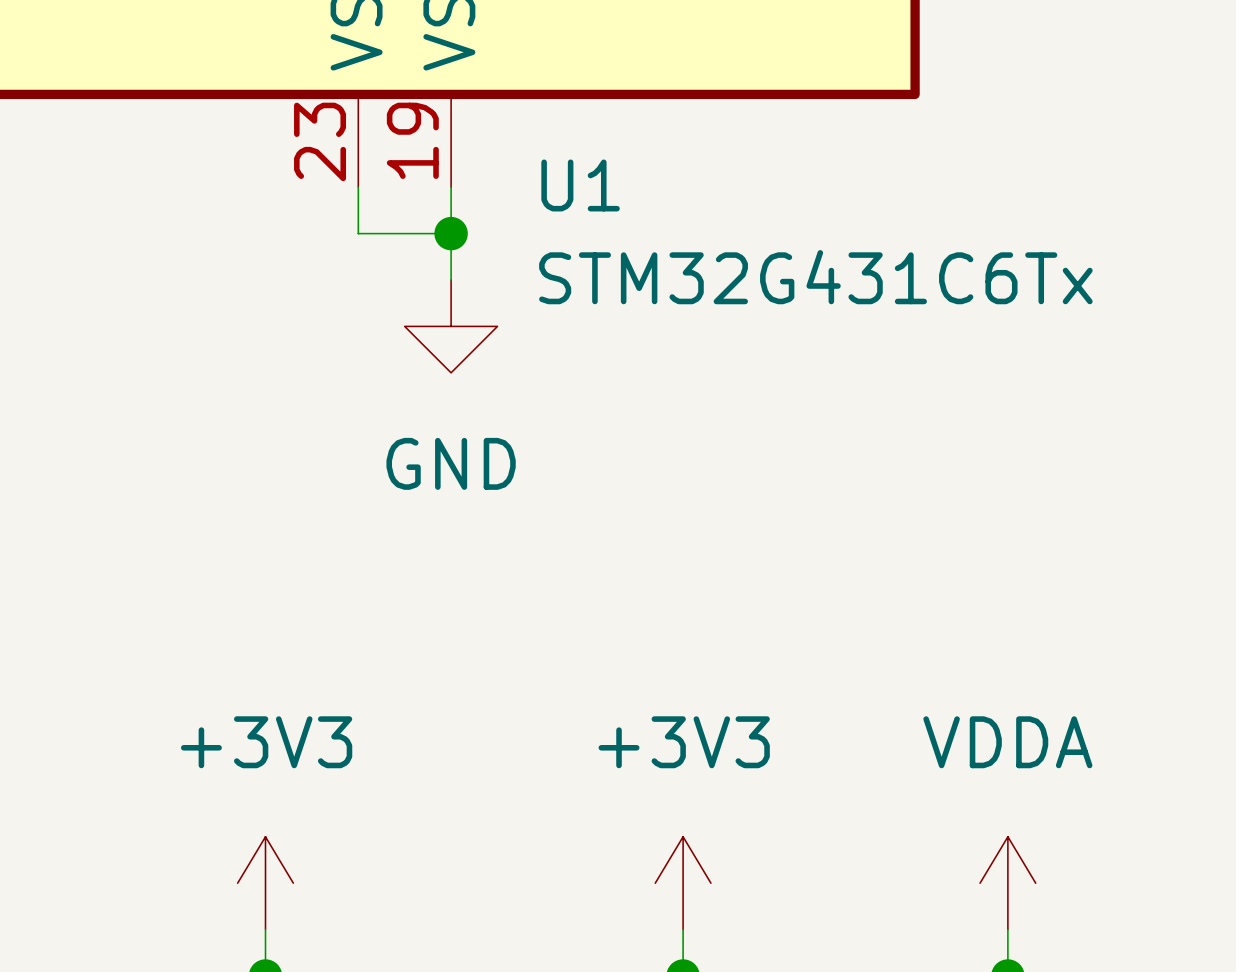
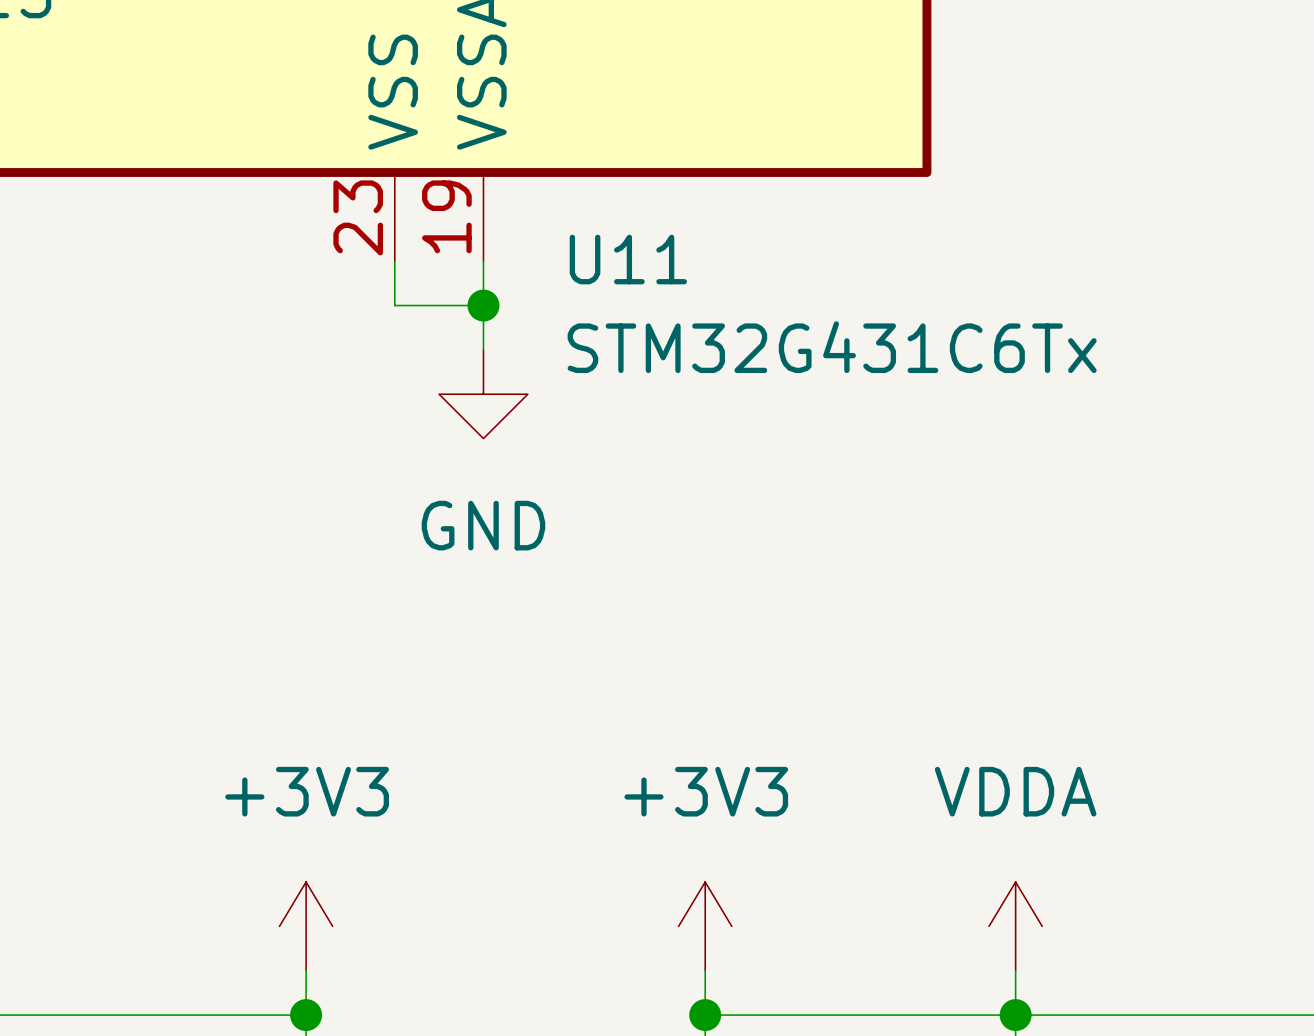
U1 name: U1 (580, 185) -> U11 (628, 259)

